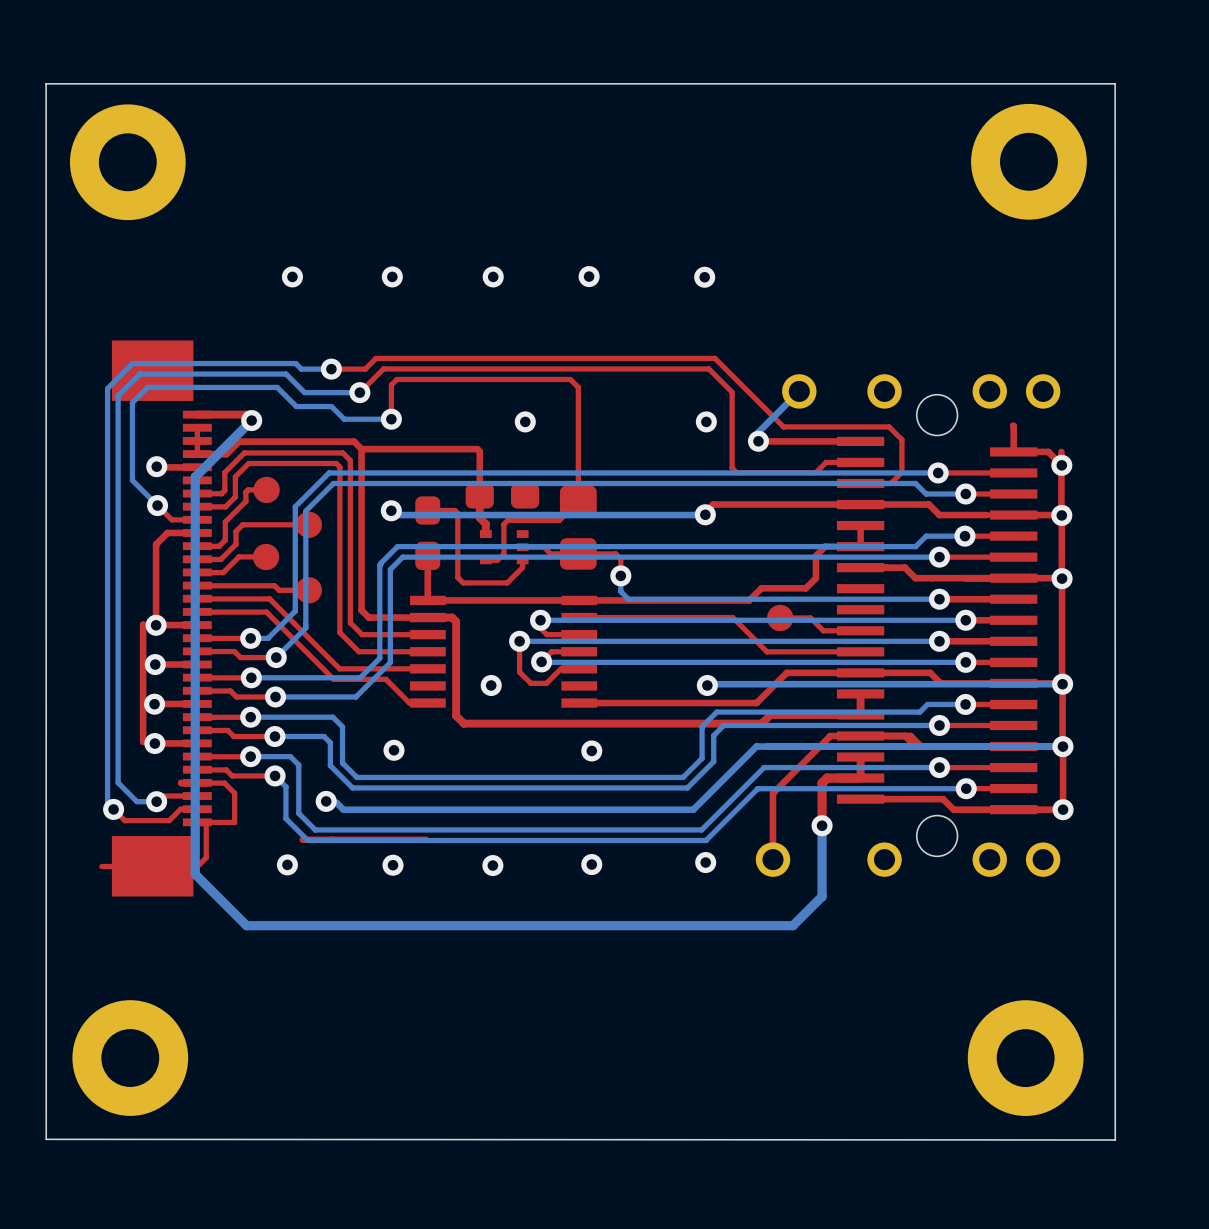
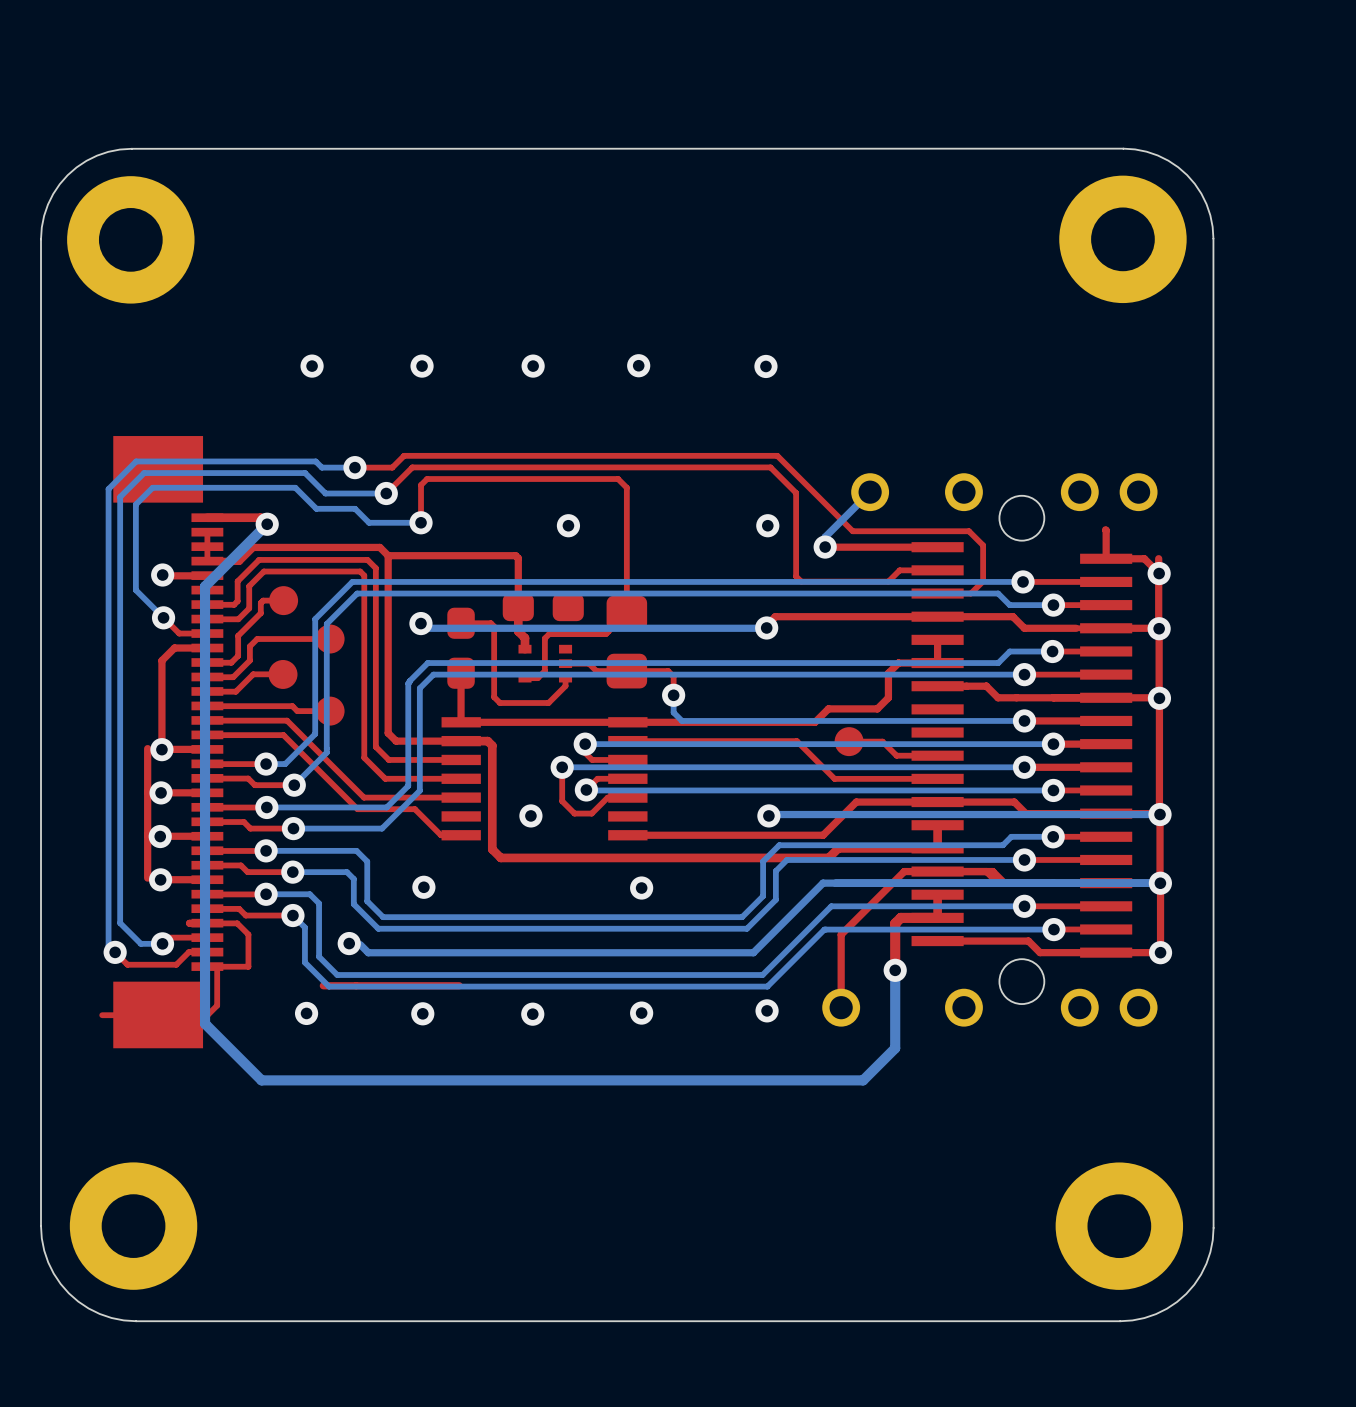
board edge: (1115, 83) (46, 83) (46, 1139) (1115, 1140) (1115, 83) -> (1123, 148) (1135, 149) (1157, 155) (1168, 160) (1187, 175) (1201, 193) (1206, 204) (1210, 215) (1213, 238) (1213, 1227) (1210, 1252) (1206, 1263) (1194, 1284) (1186, 1293) (1177, 1301) (1156, 1314) (1144, 1318) (1120, 1321) (136, 1321) (111, 1317) (99, 1313) (88, 1308) (68, 1293) (60, 1283) (48, 1262) (44, 1250) (41, 1226) (41, 239) (44, 215) (47, 204) (53, 193) (67, 175) (86, 160) (97, 155) (108, 151) (131, 148) (1123, 148)

